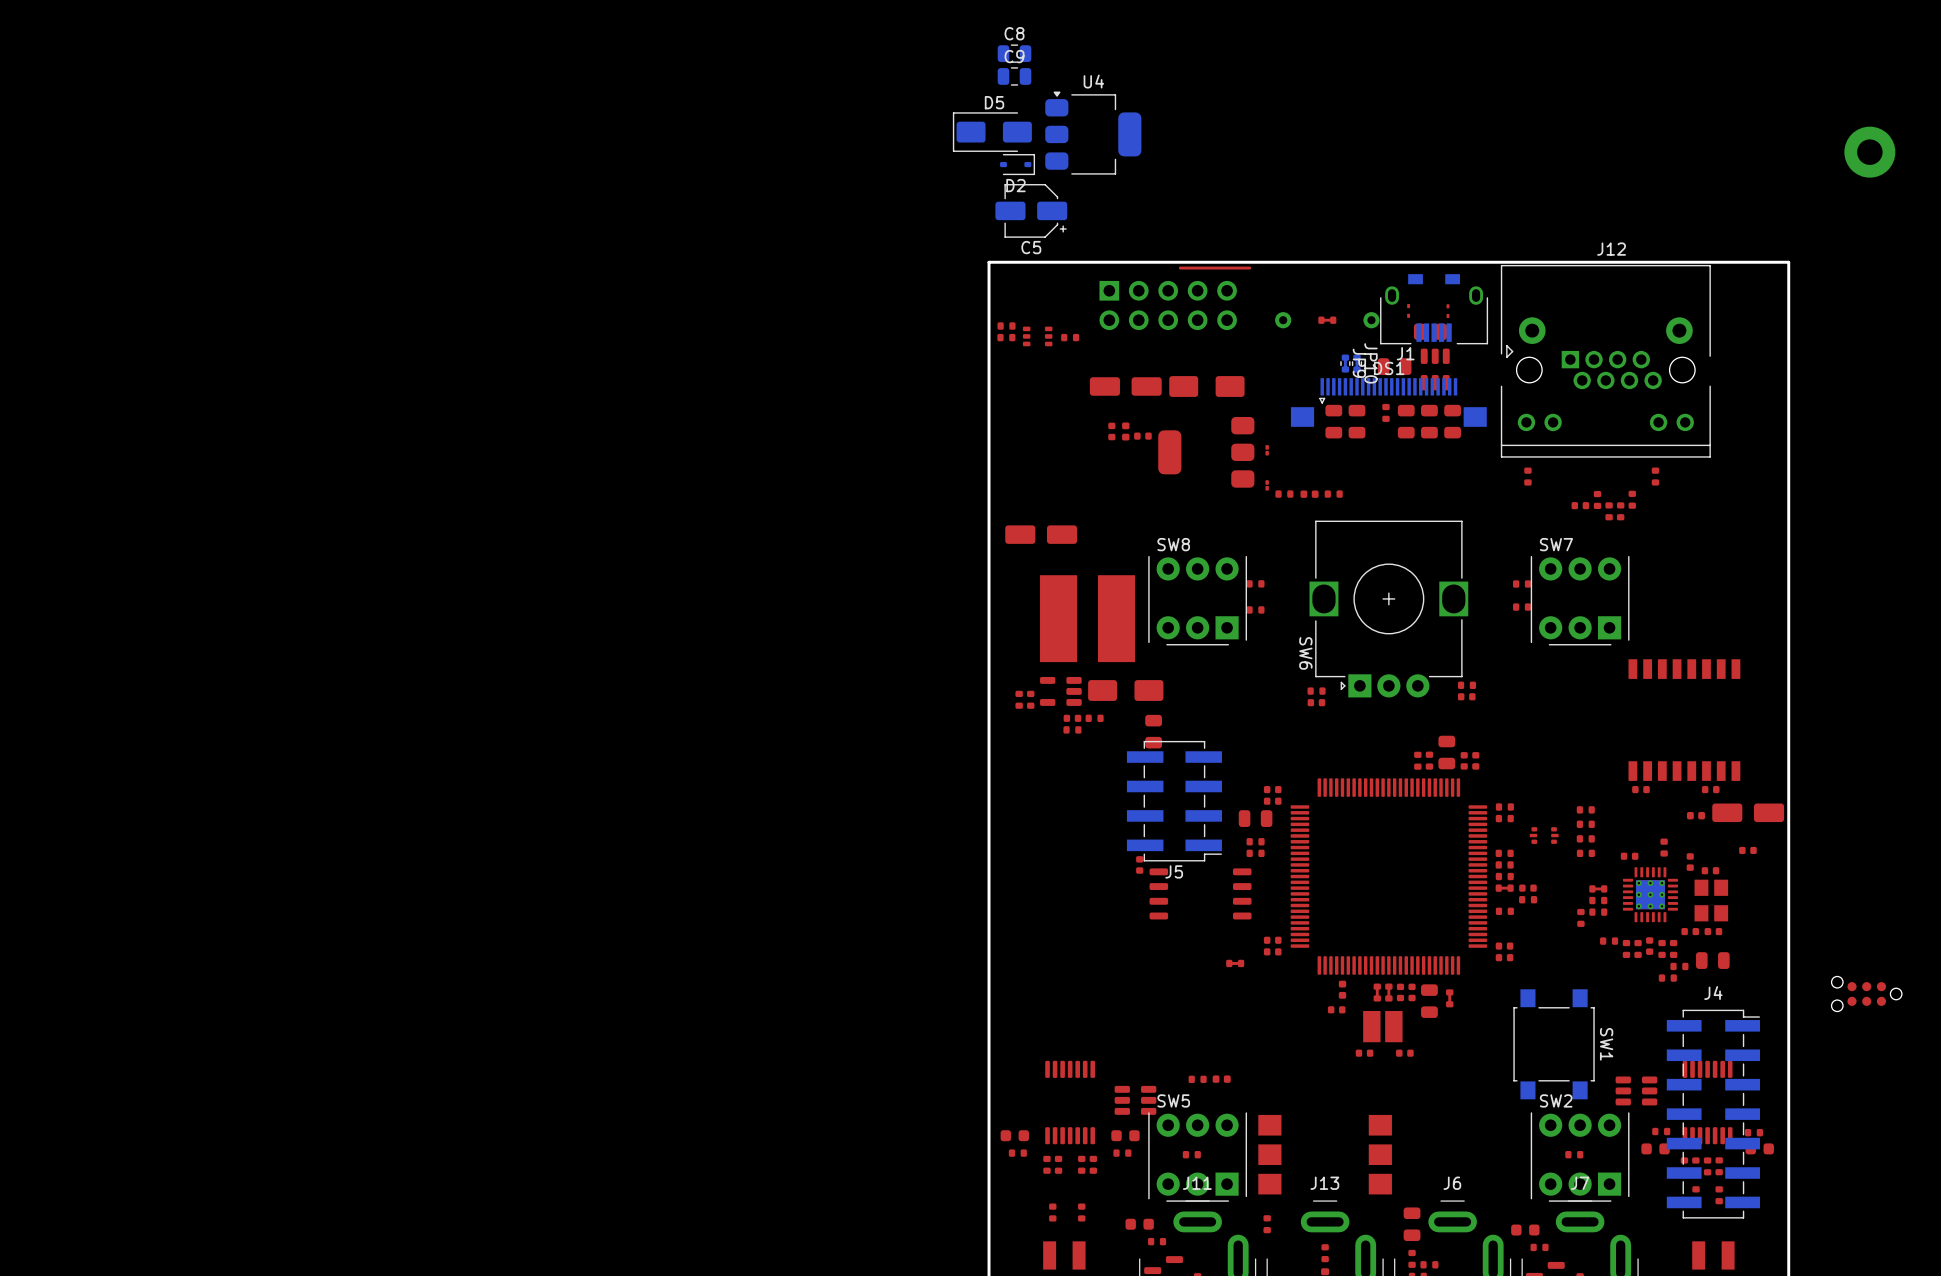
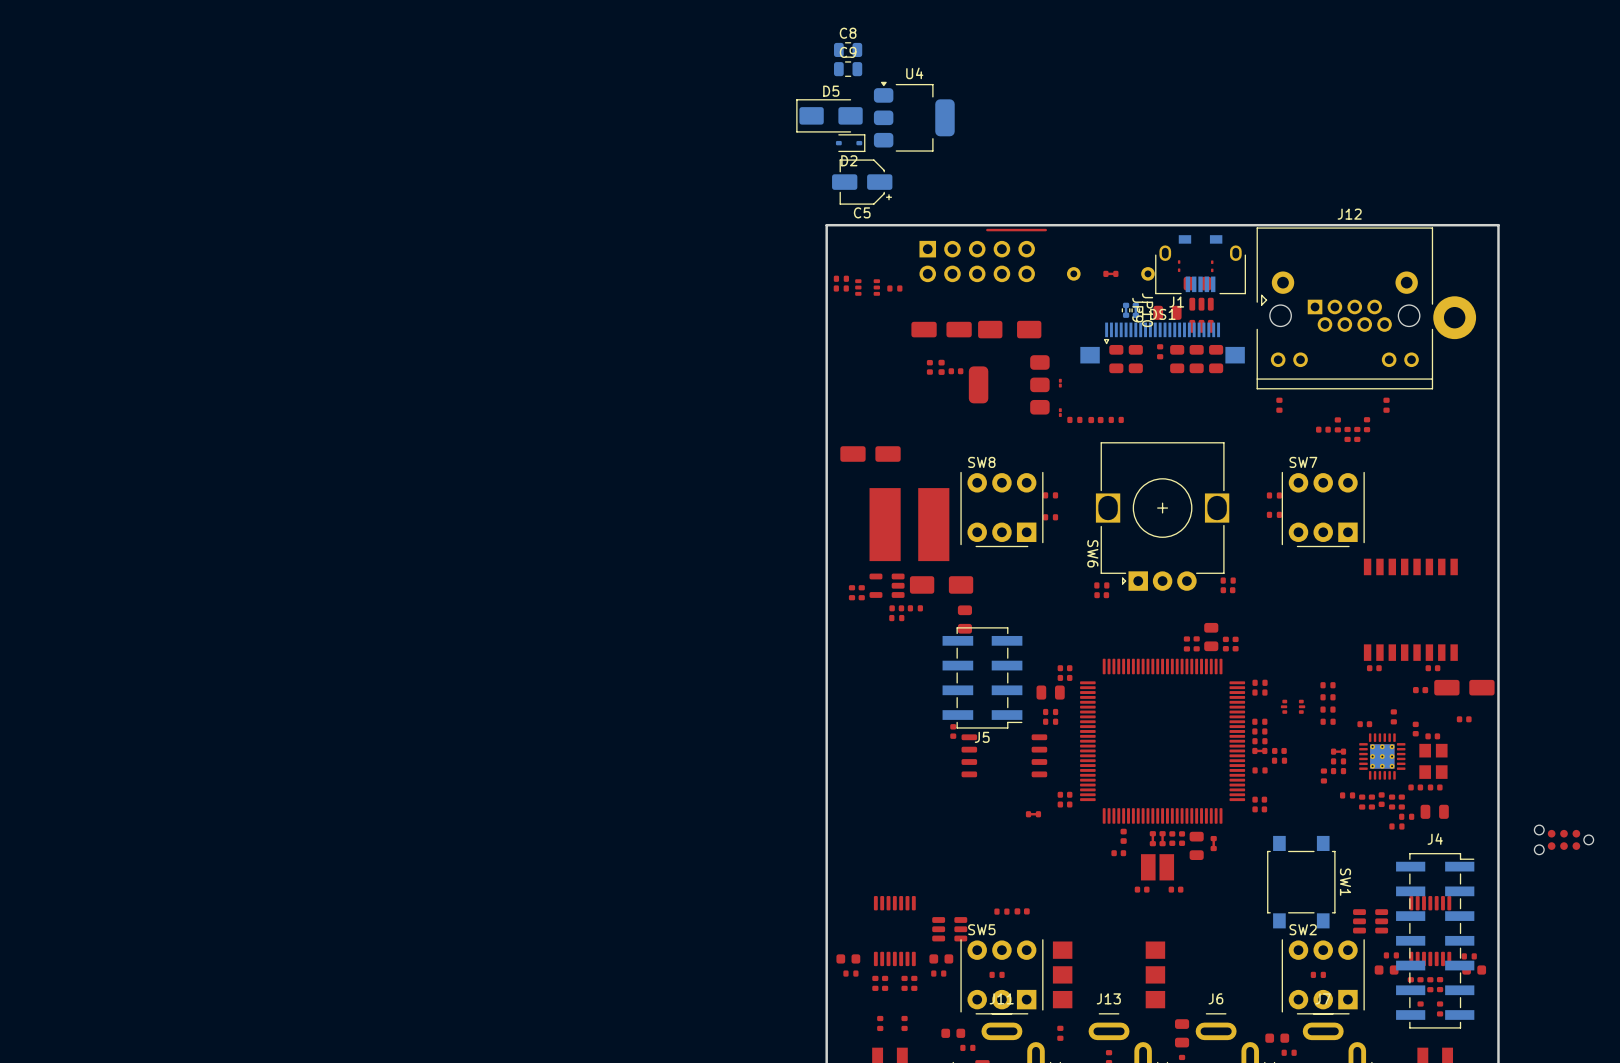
part position: (1869, 152) -> (1454, 317)

